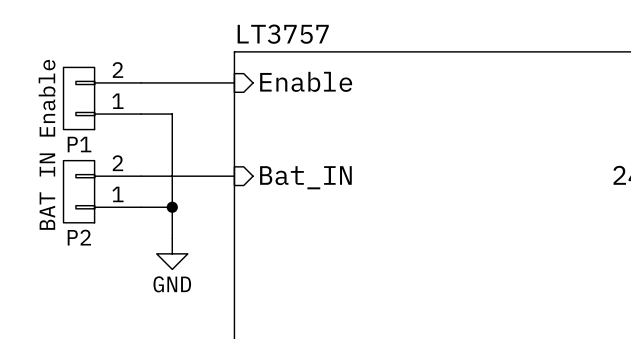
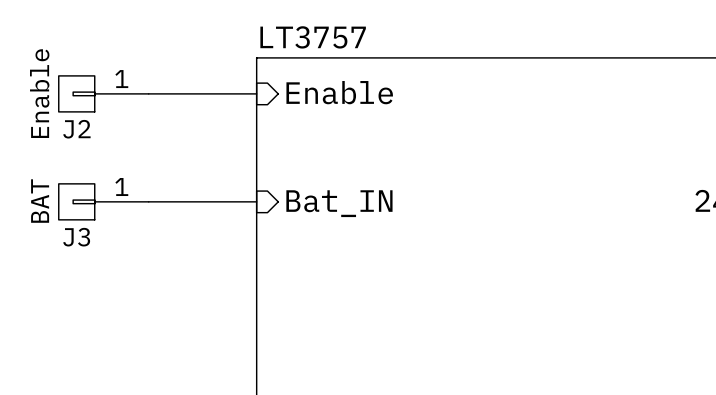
J2: none -> Enable (103, 93)
P1: Enable (102, 98) -> none
wire: (141, 114) (172, 114) (172, 238) -> none
J3: none -> BAT (103, 201)
P2: BAT IN (102, 191) -> none
wire: (141, 207) (172, 207) -> none
junction: (172, 207) -> none
power symbol: GND (172, 253) -> none

